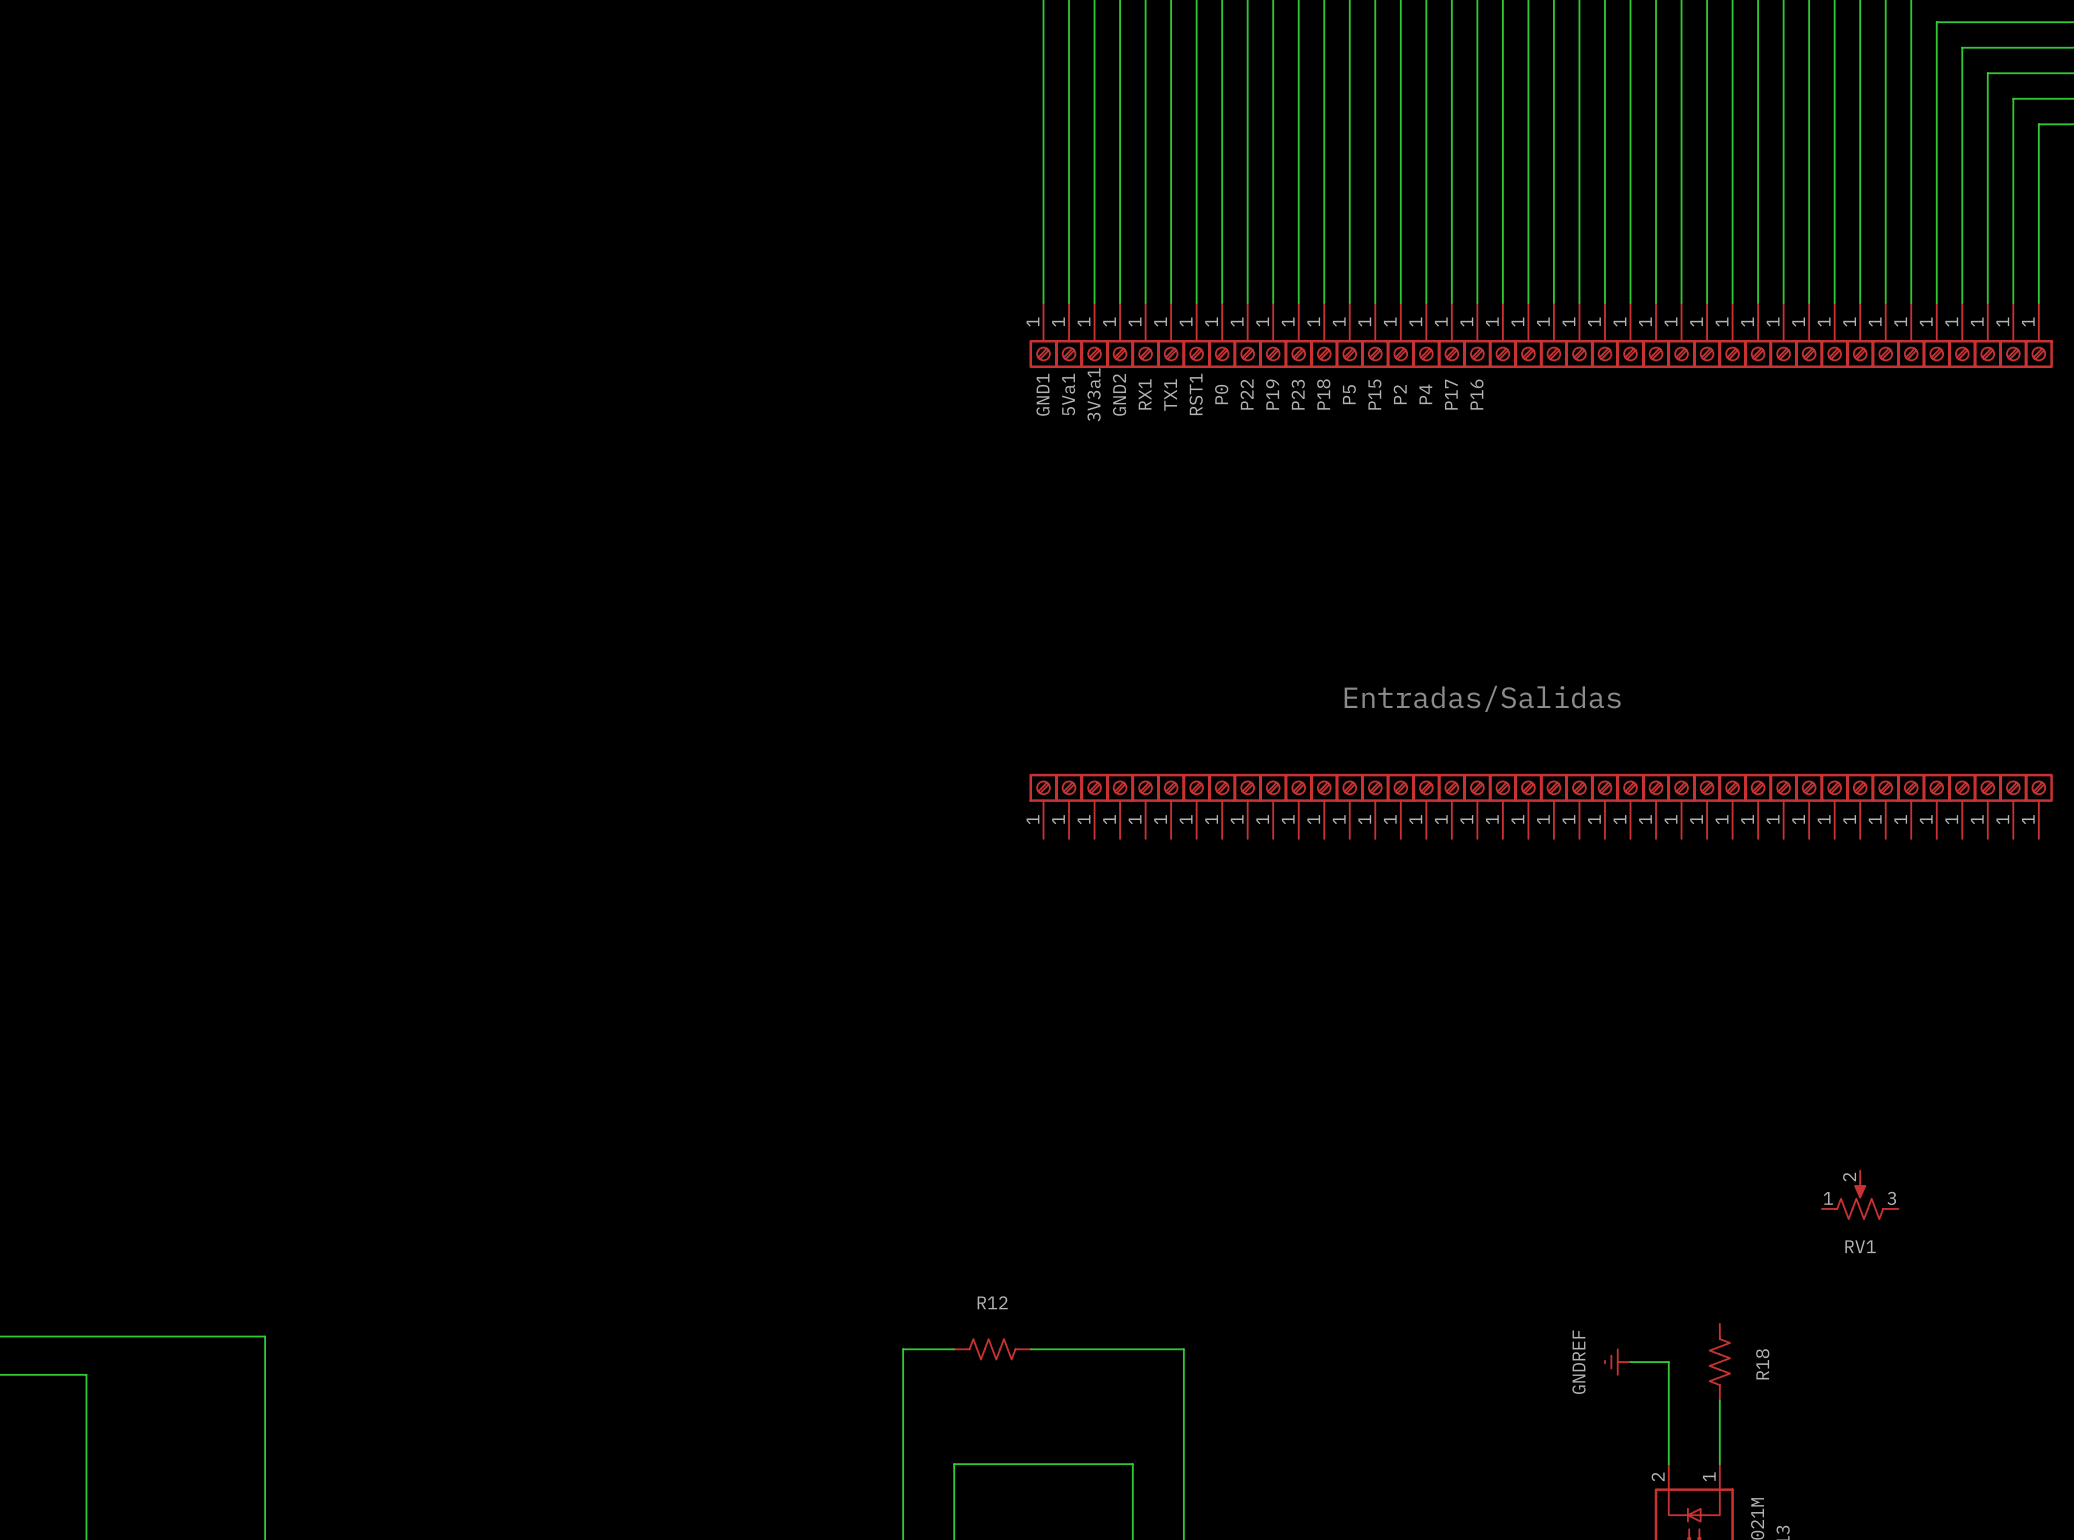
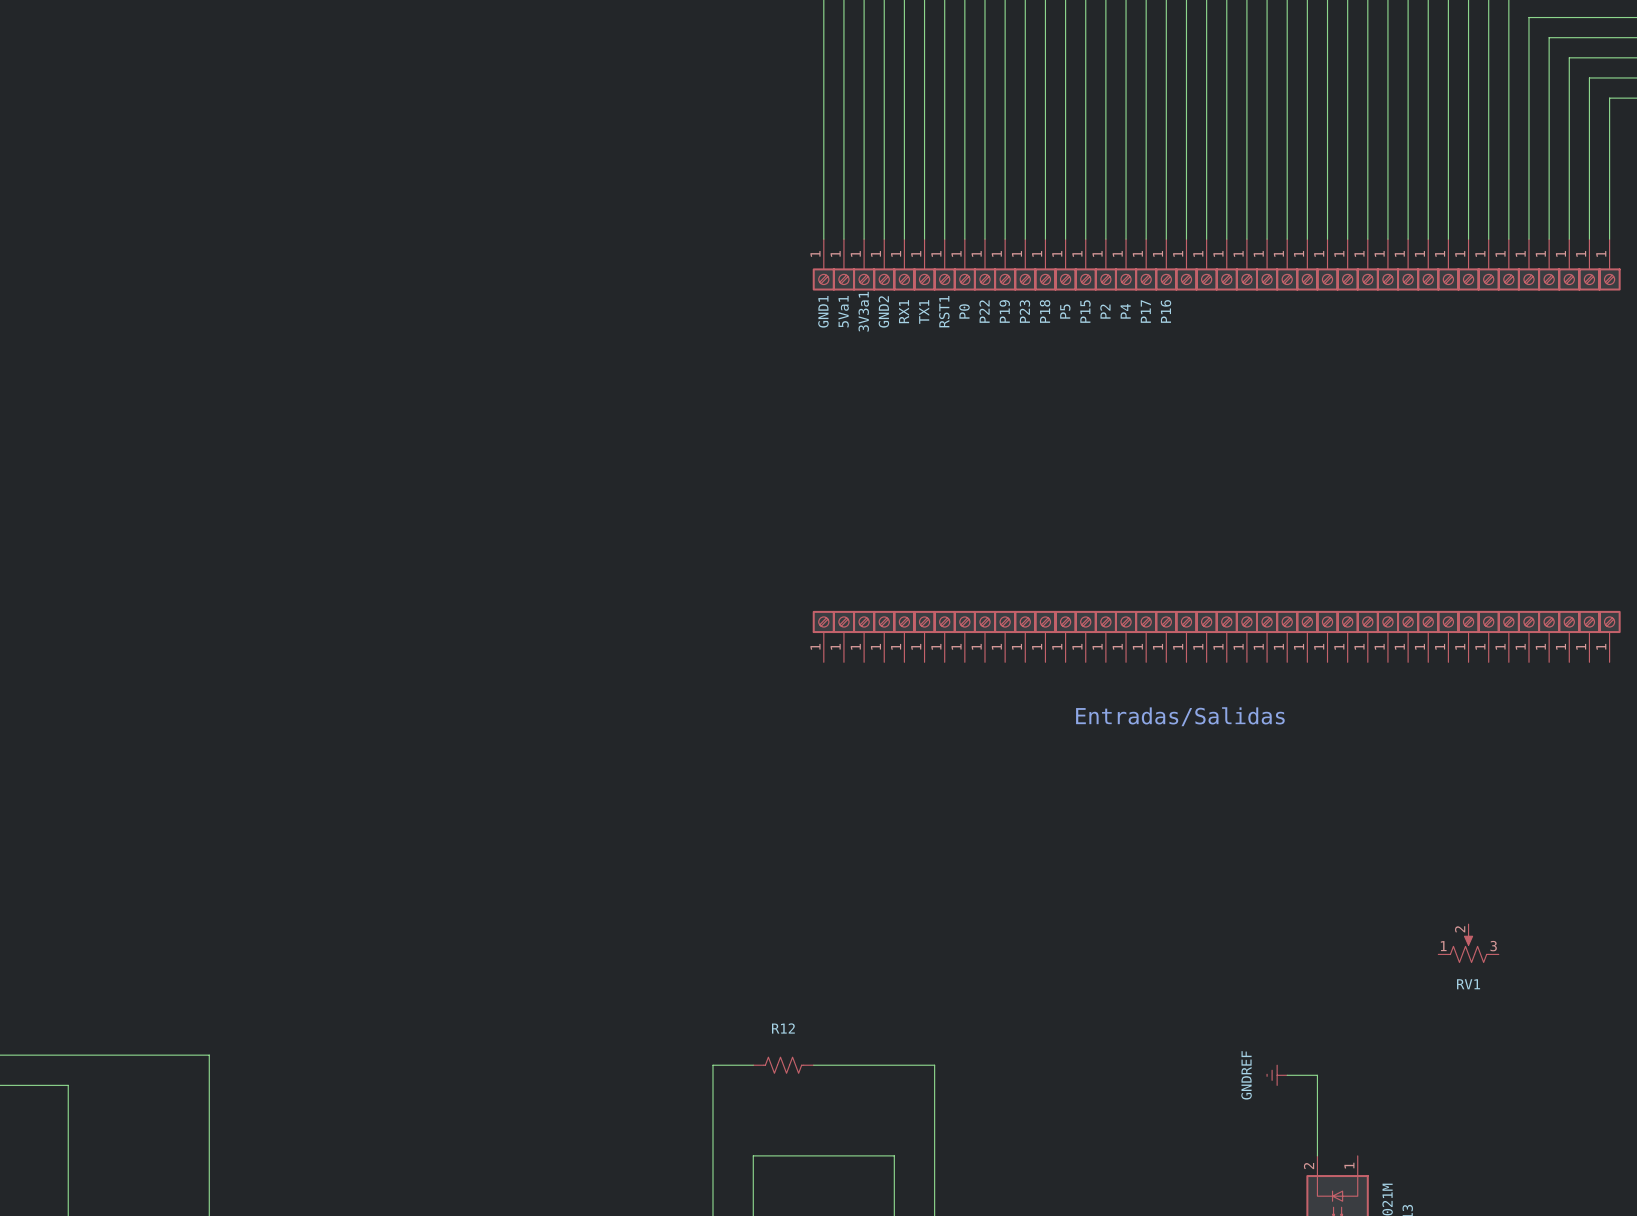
text position: Entradas/Salidas (1482, 698) -> Entradas/Salidas (1180, 716)
R18: (1719, 1362) -> none
wire: (1719, 1400) (1719, 1464) -> none

